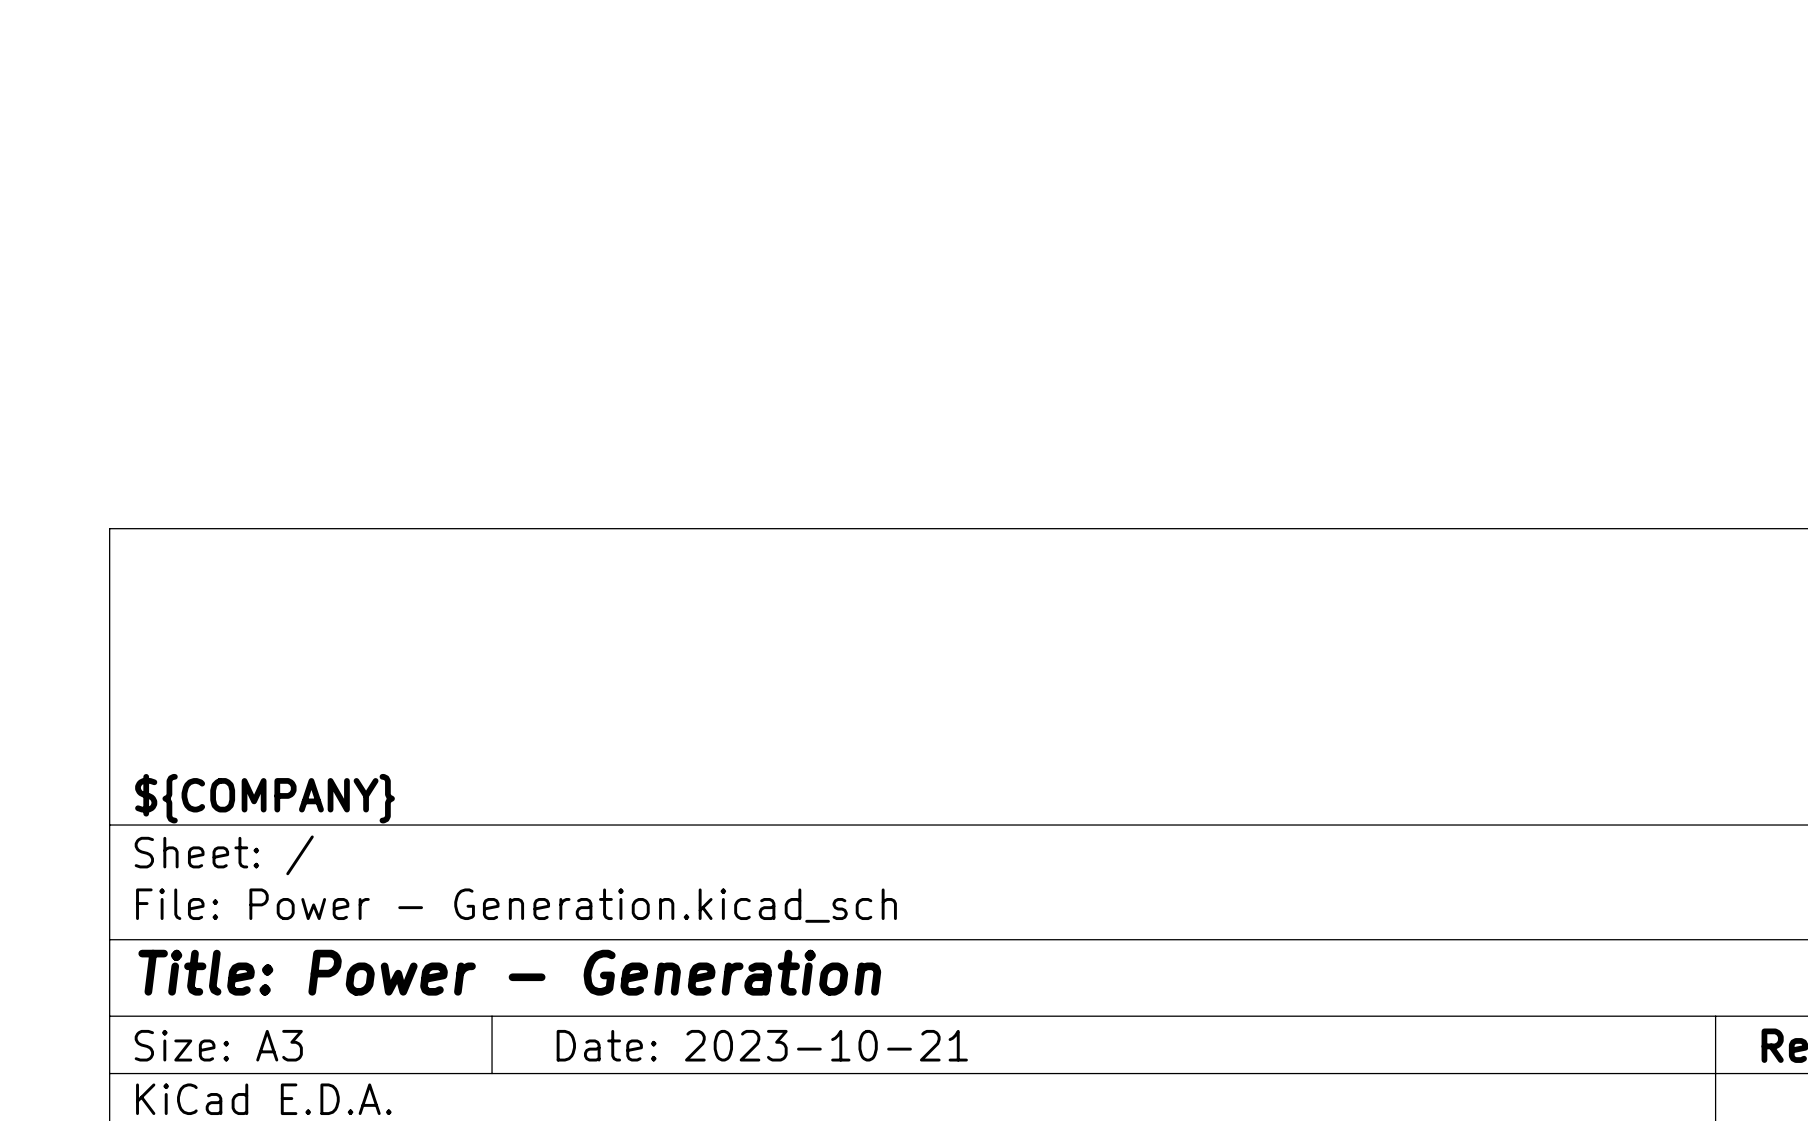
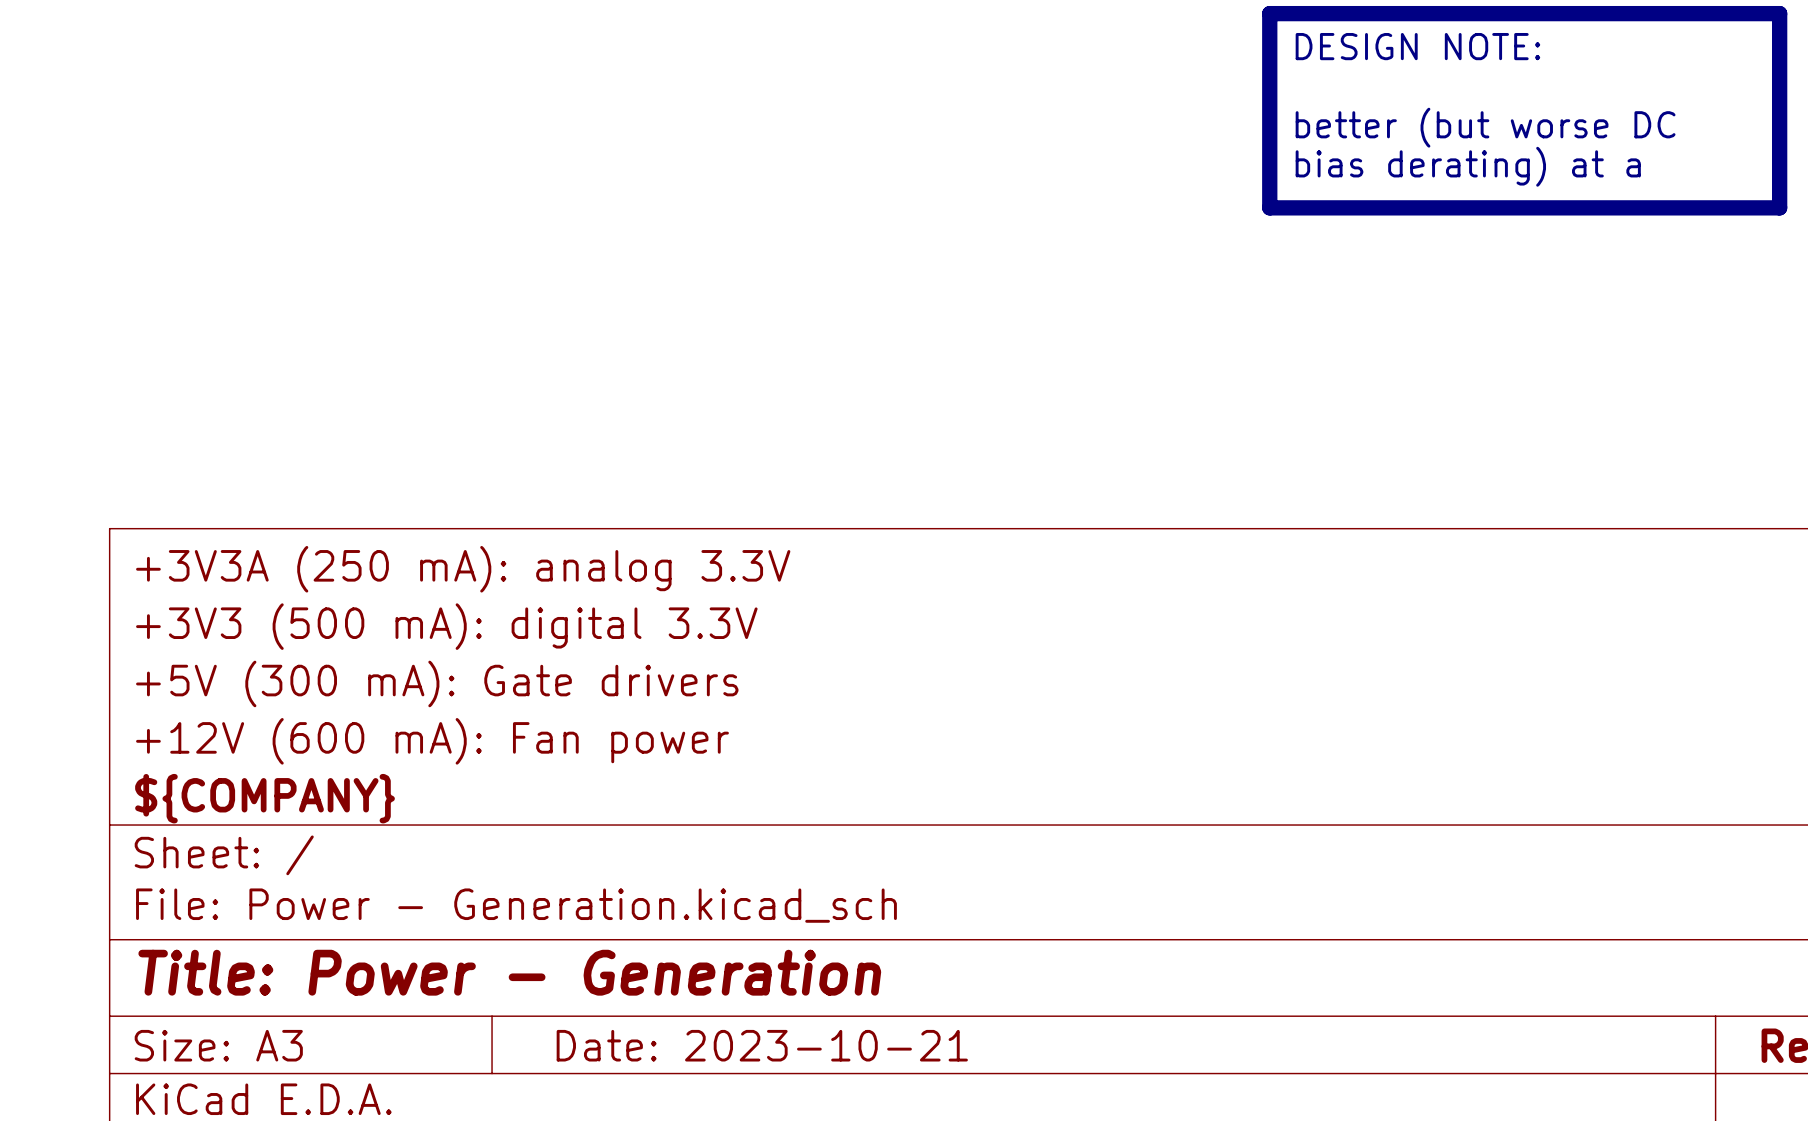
line: none -> (1269, 13) (1779, 13) (1779, 207) (1269, 207) (1269, 13)
text: none -> DESIGN NOTE: (1417, 46)
text: none -> better (but worse DC (1485, 127)
text: none -> bias derating) at a (1468, 166)
title block: none -> +3V3A (250 mA): analog 3.3V (463, 569)
title block: none -> +3V3 (500 mA): digital 3.3V (446, 626)
title block: none -> +5V (300 mA): Gate drivers (437, 683)
title block: none -> +12V (600 mA): Fan power (432, 741)

